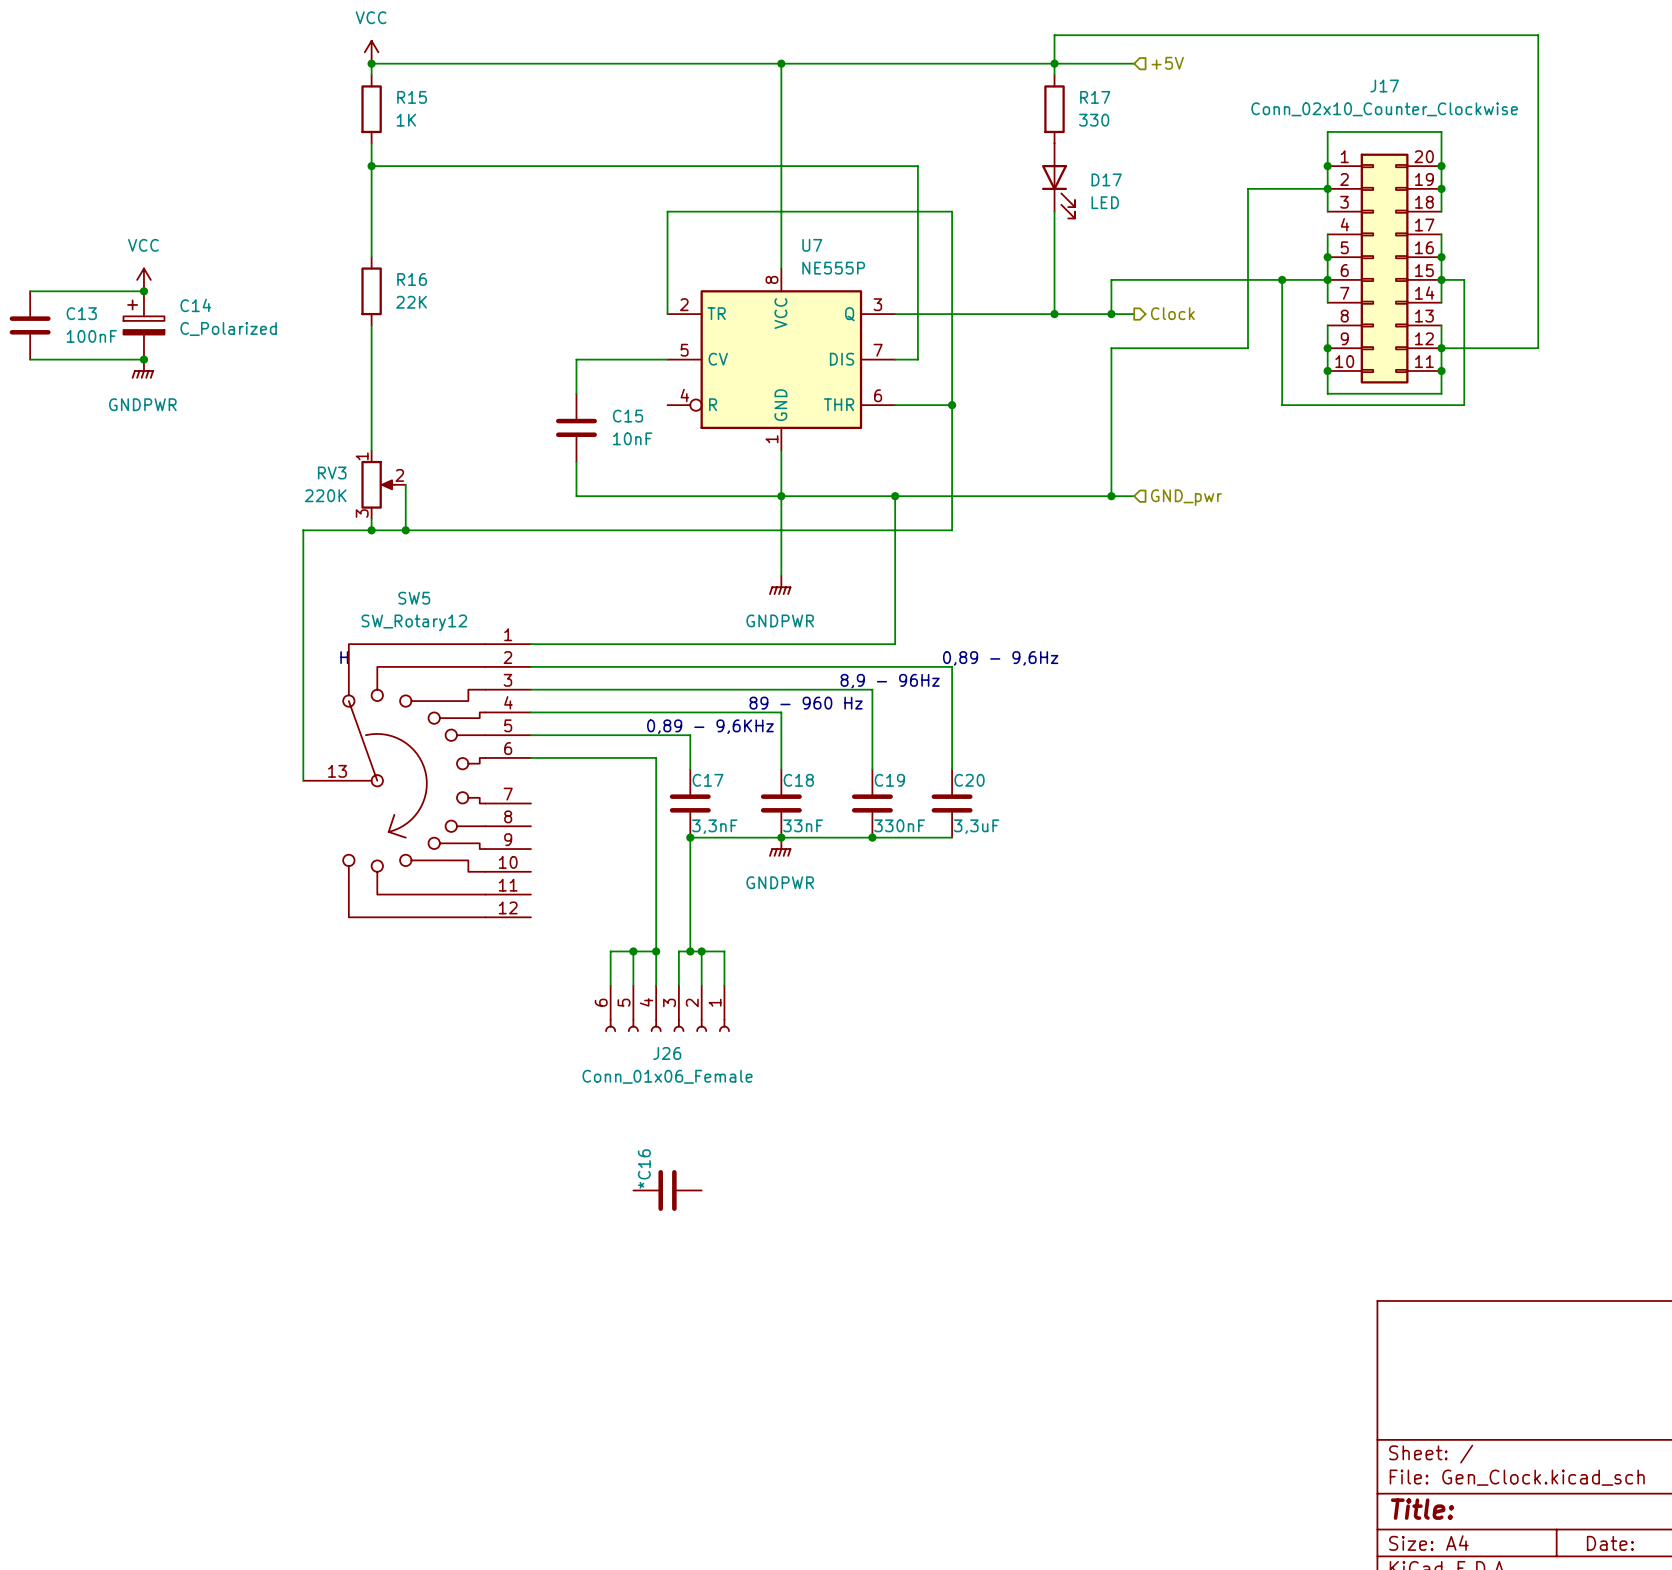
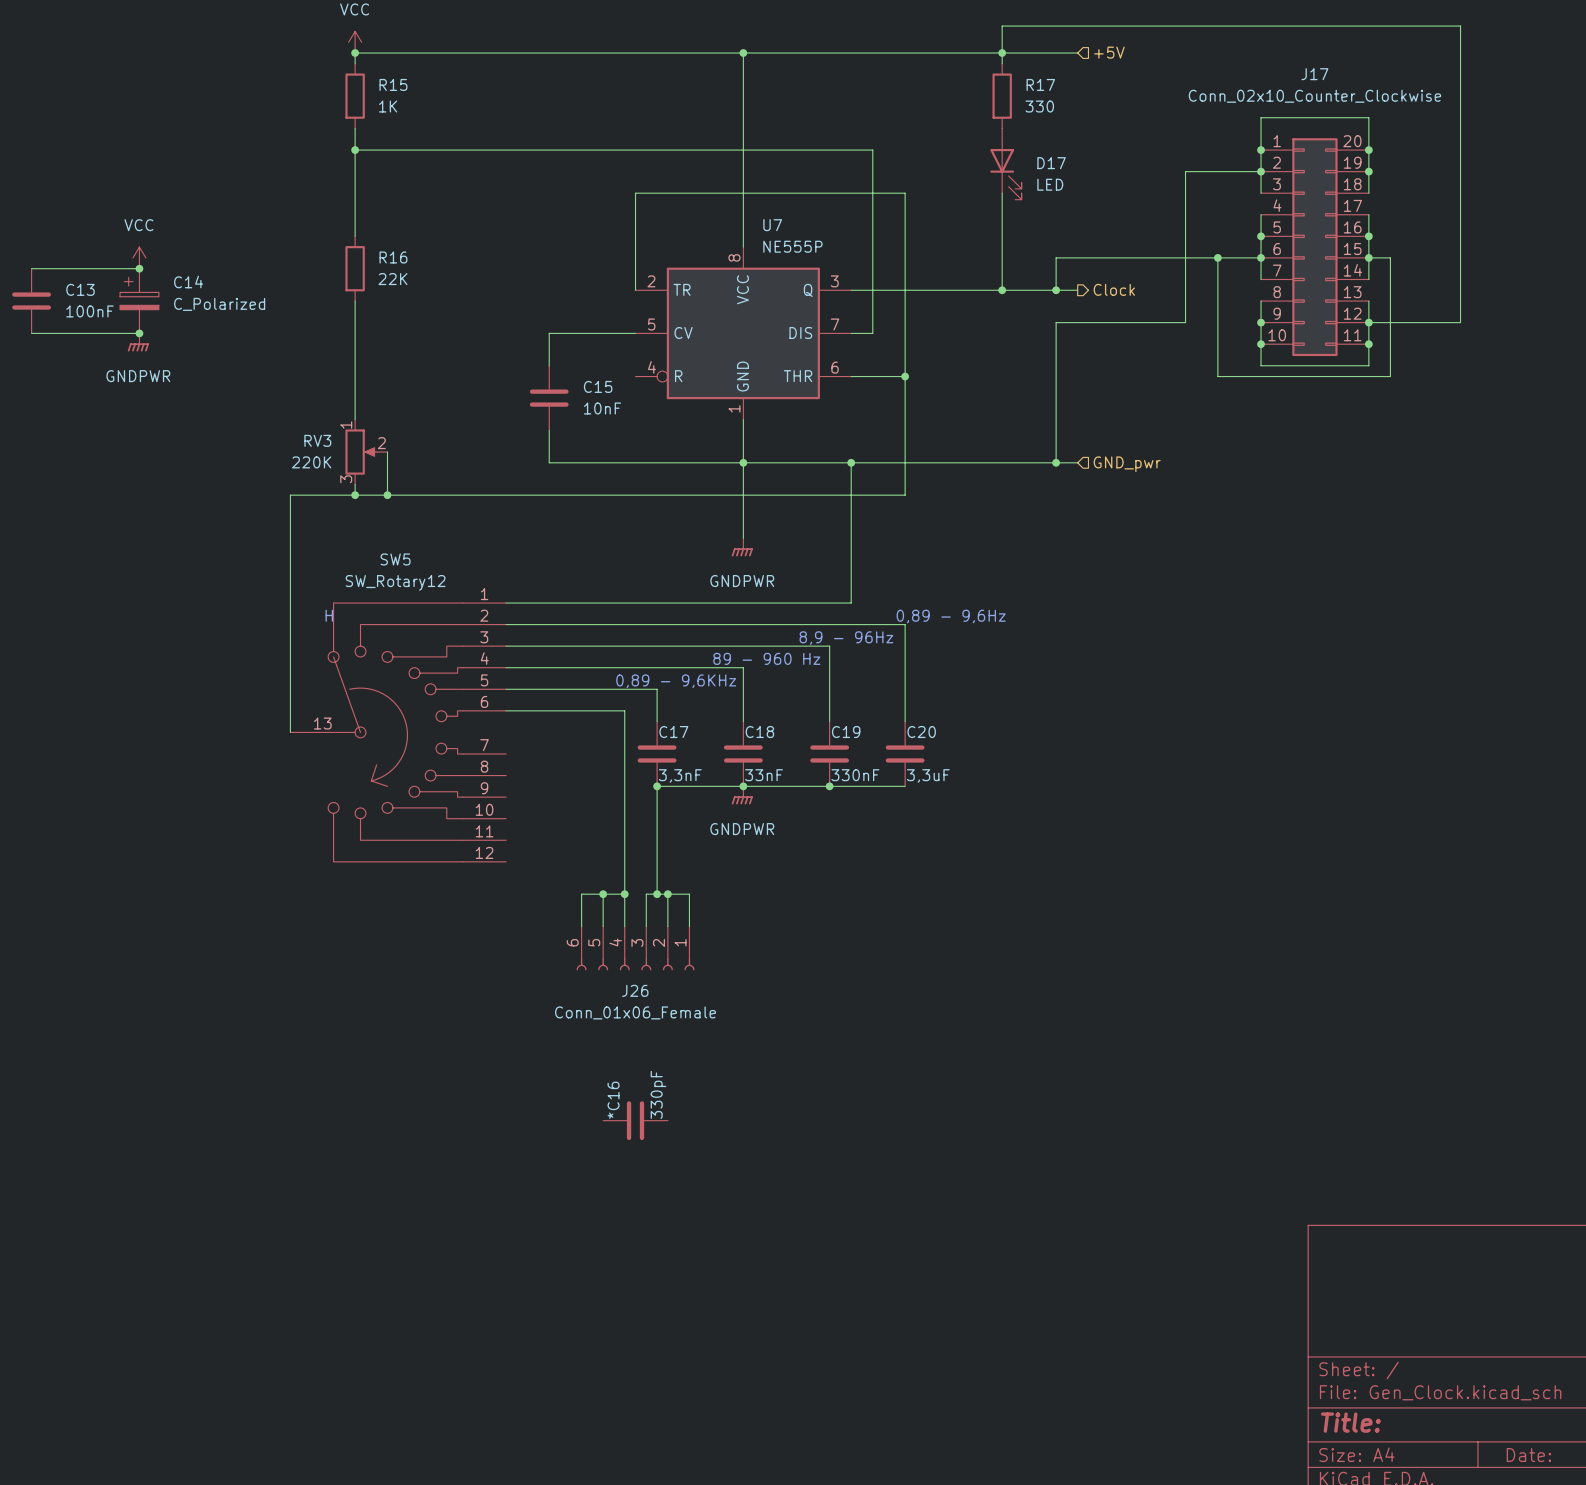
*C16 value: none -> 330pF (658, 1094)

